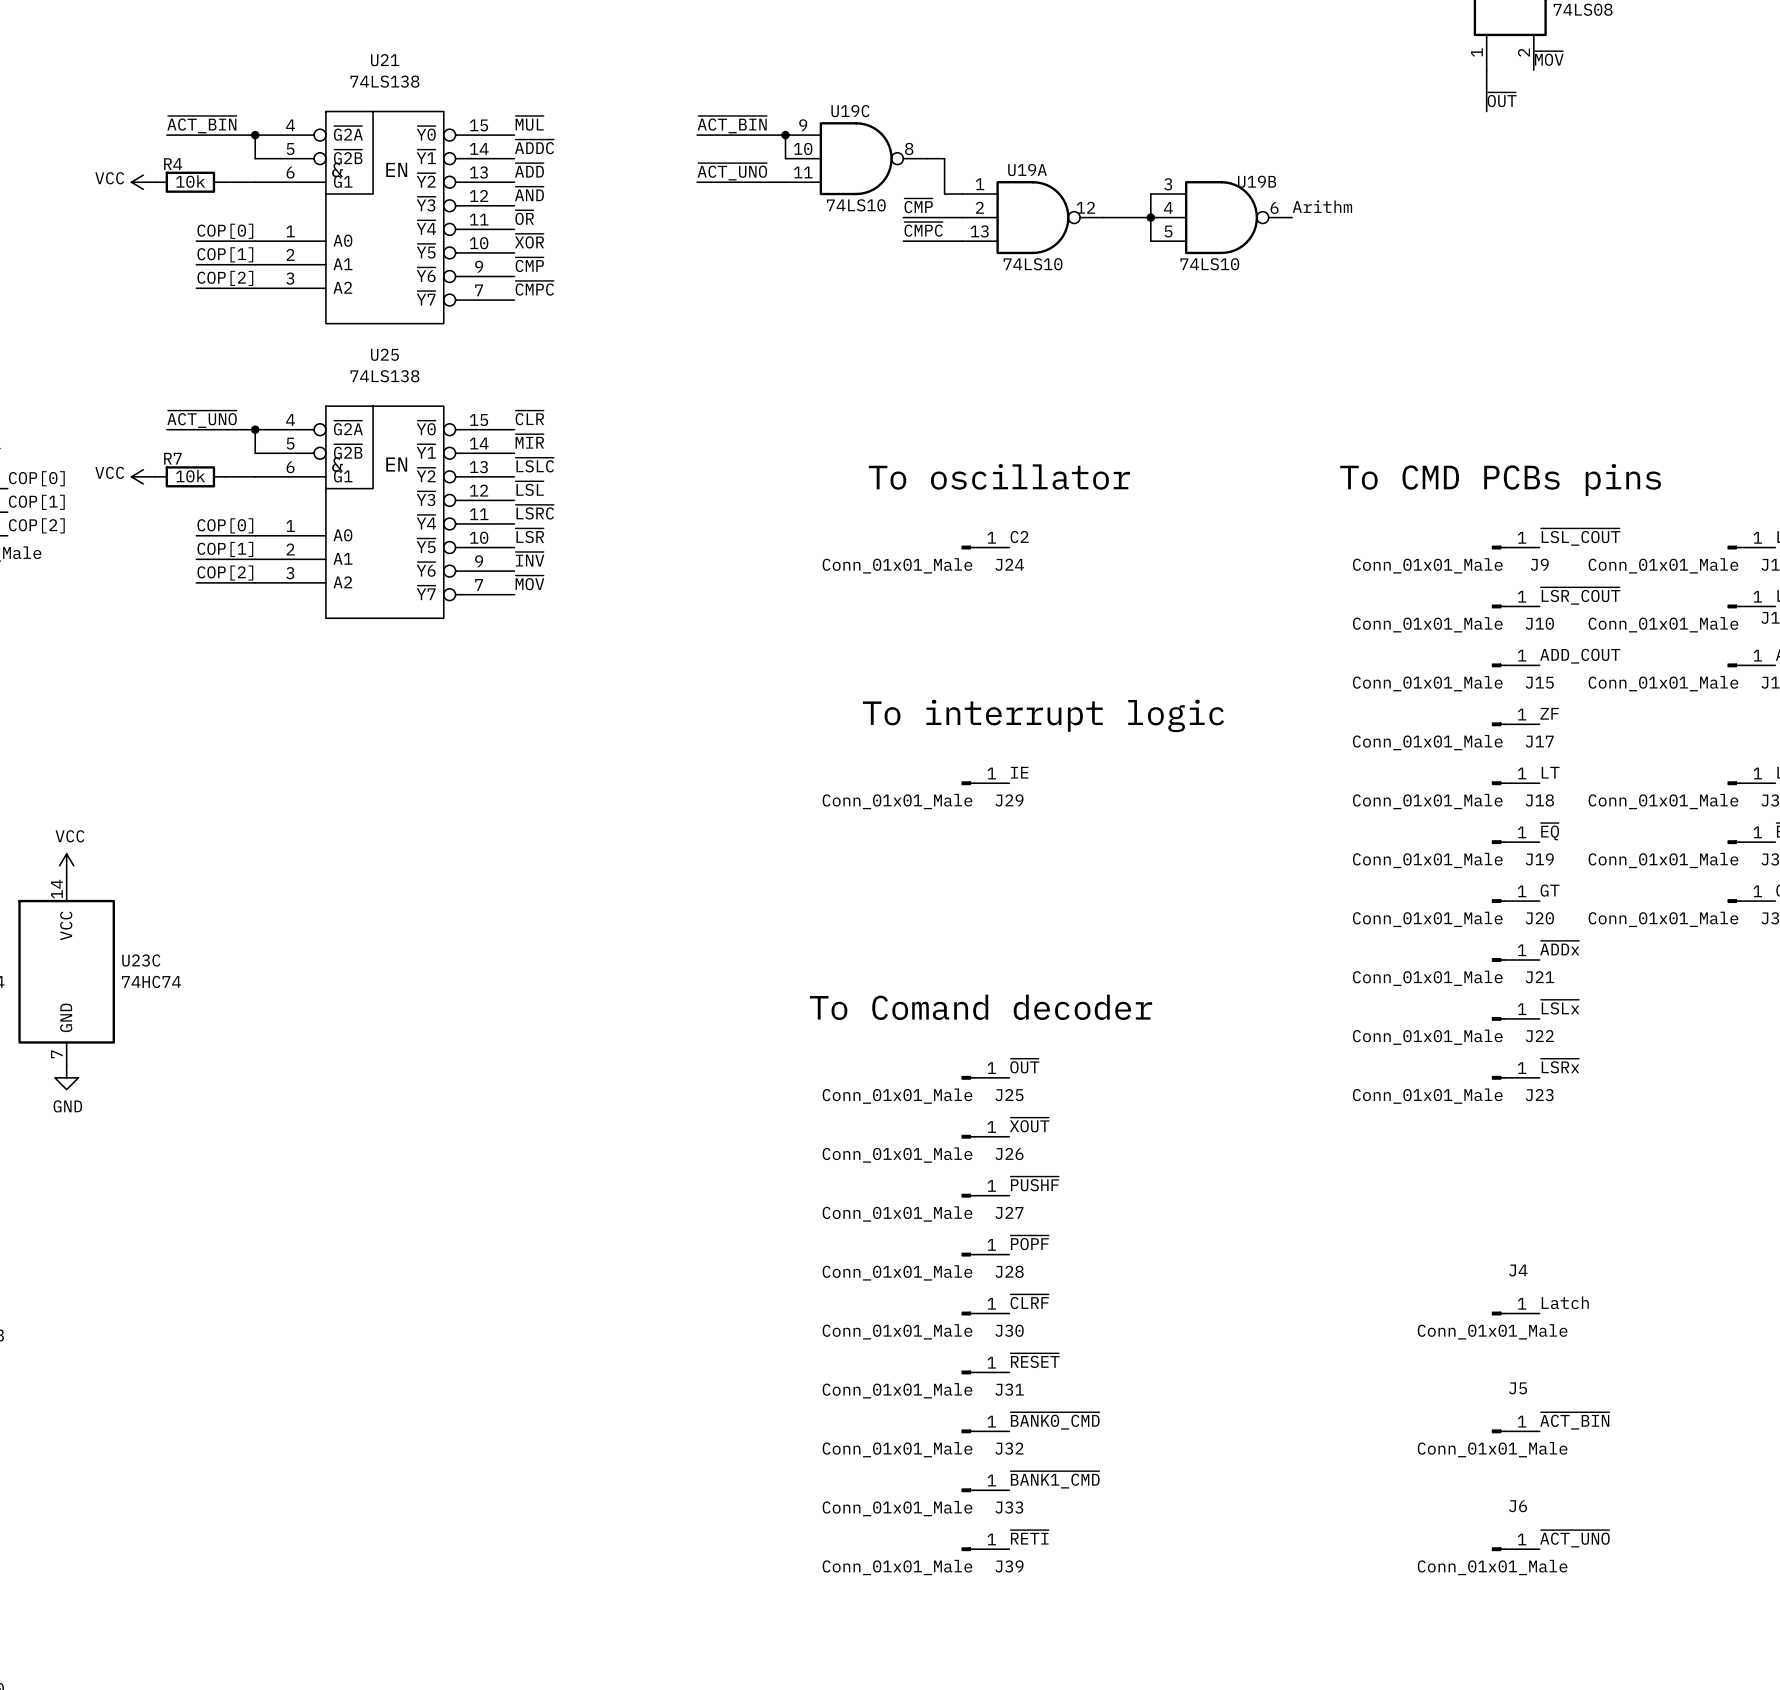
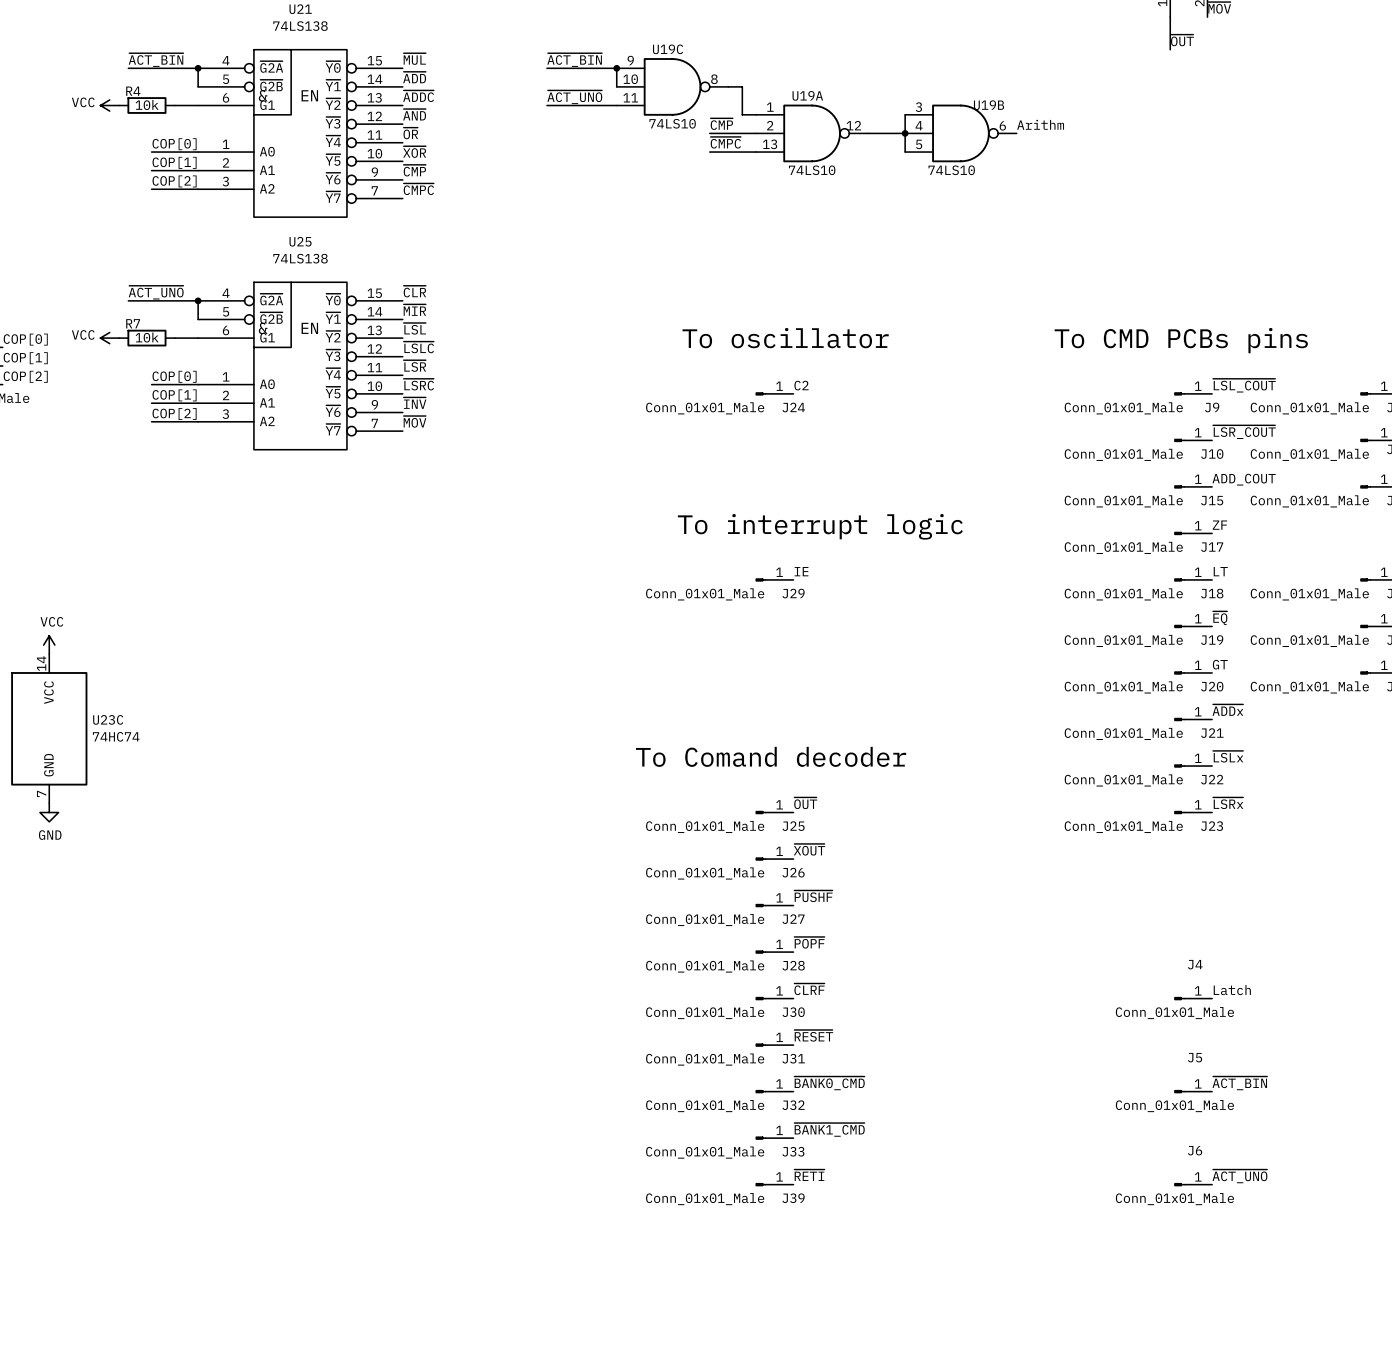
label: ~{ADDC} (534, 146) -> ~{ADD} (414, 77)
label: ~{ADD} (529, 170) -> ~{ADDC} (418, 96)
label: ~{LSLC} (534, 465) -> ~{LSL} (414, 328)
label: ~{LSL} (529, 488) -> ~{LSLC} (418, 347)
label: ~{LSRC} (534, 512) -> ~{LSR} (414, 366)
label: ~{LSR} (529, 535) -> ~{LSRC} (418, 384)

